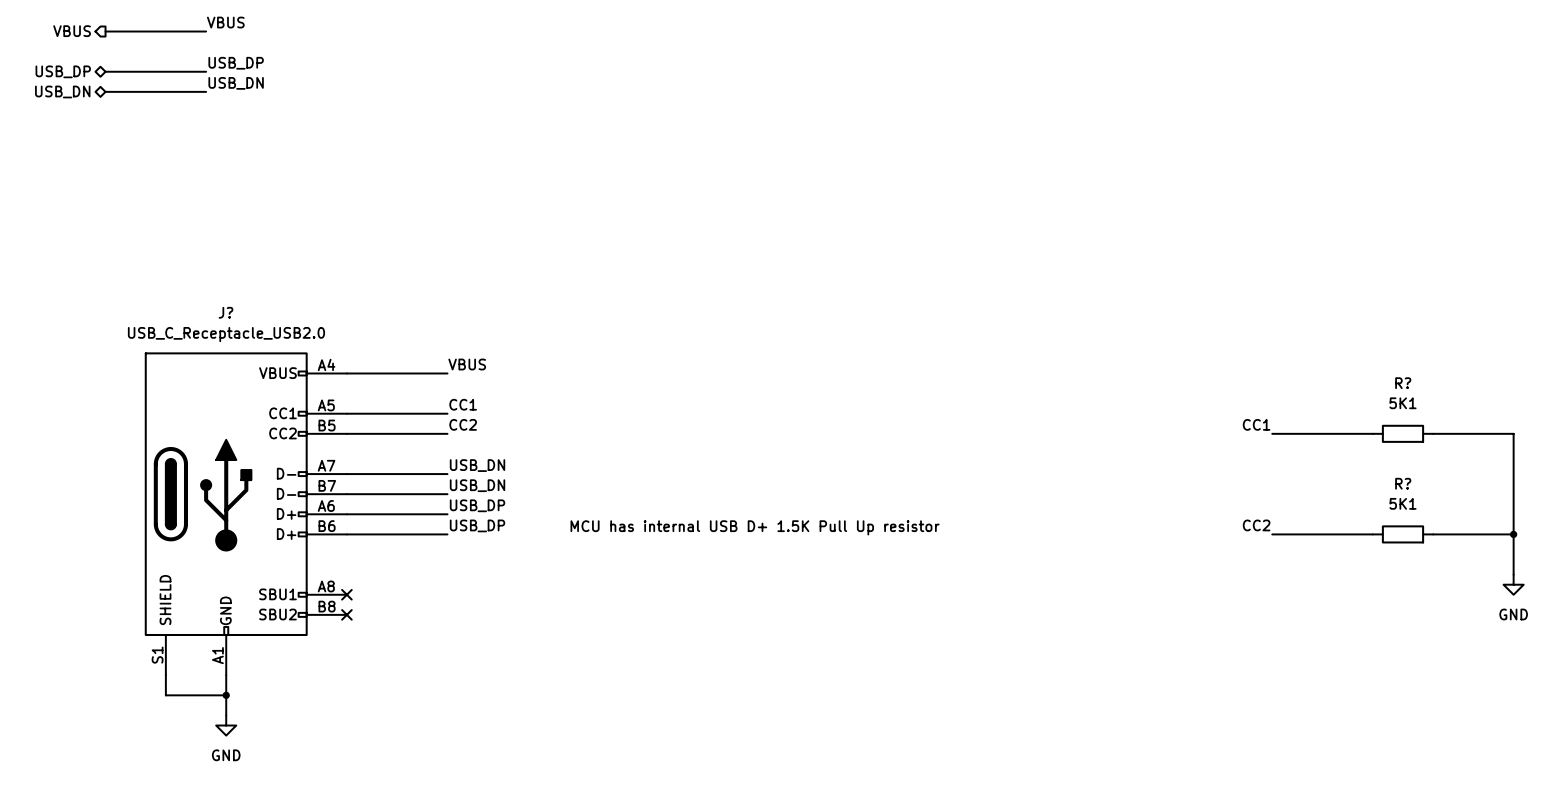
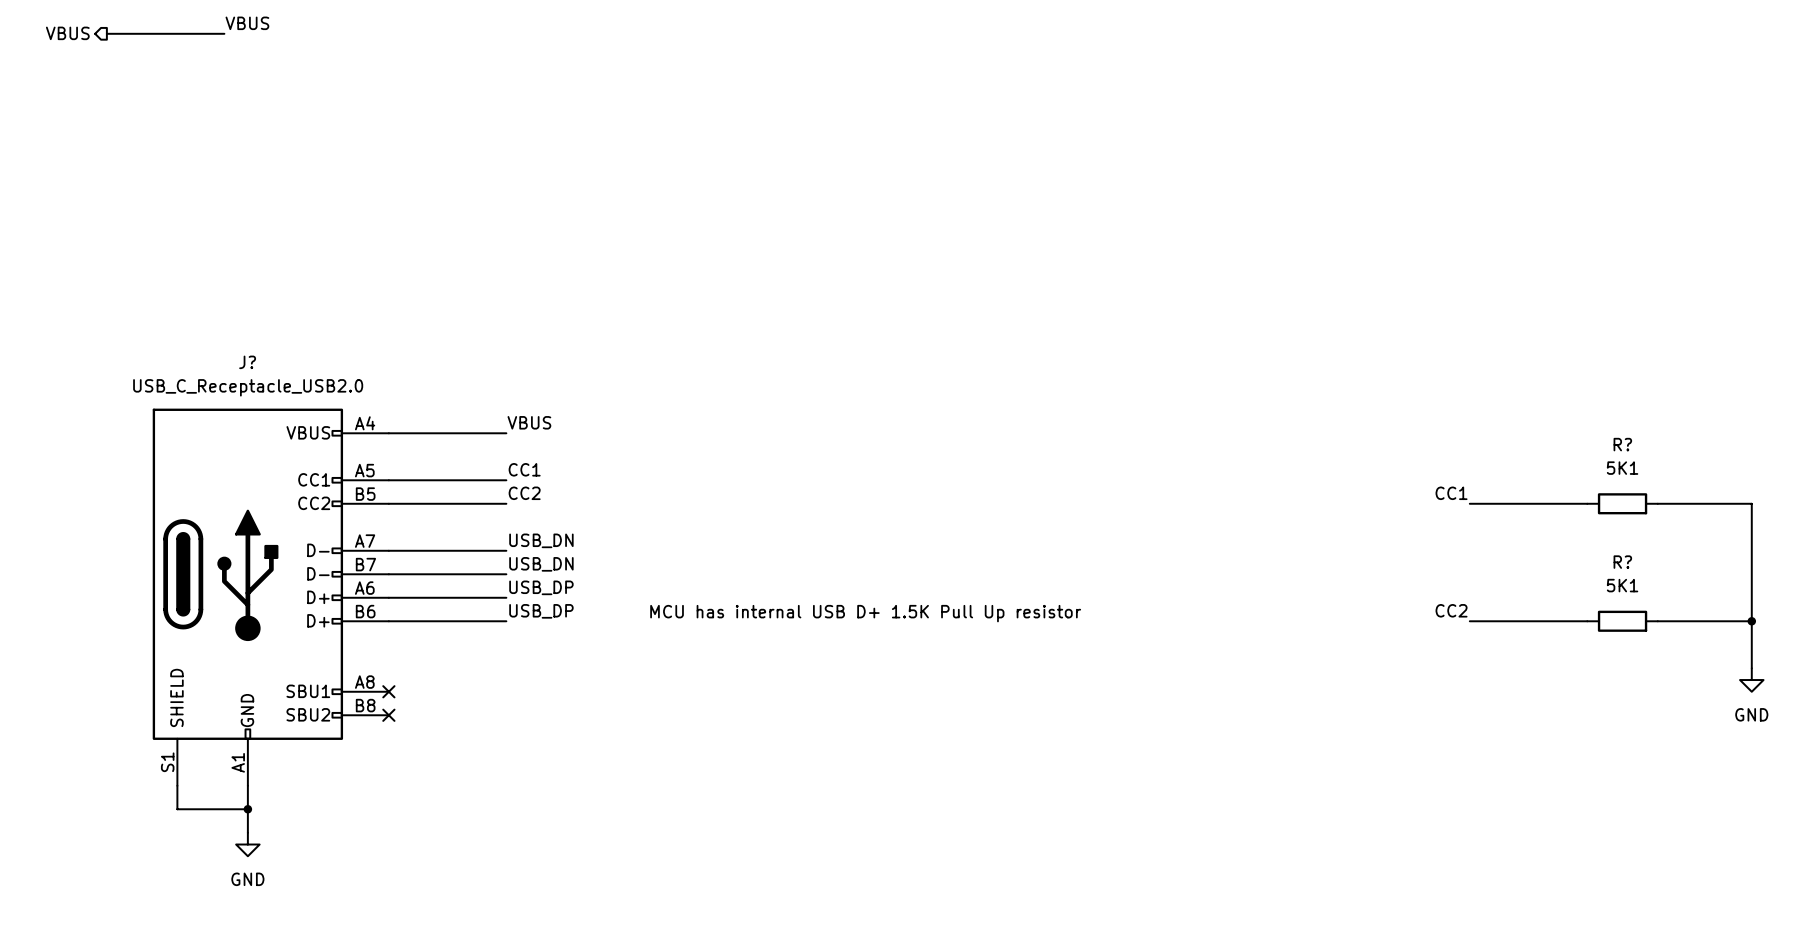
label: USB_DP (236, 63) -> none
hierarchical label: USB_DP (63, 71) -> none
wire: (105, 71) (206, 71) -> none
label: USB_DN (236, 83) -> none
hierarchical label: USB_DN (62, 91) -> none
wire: (105, 91) (206, 91) -> none

